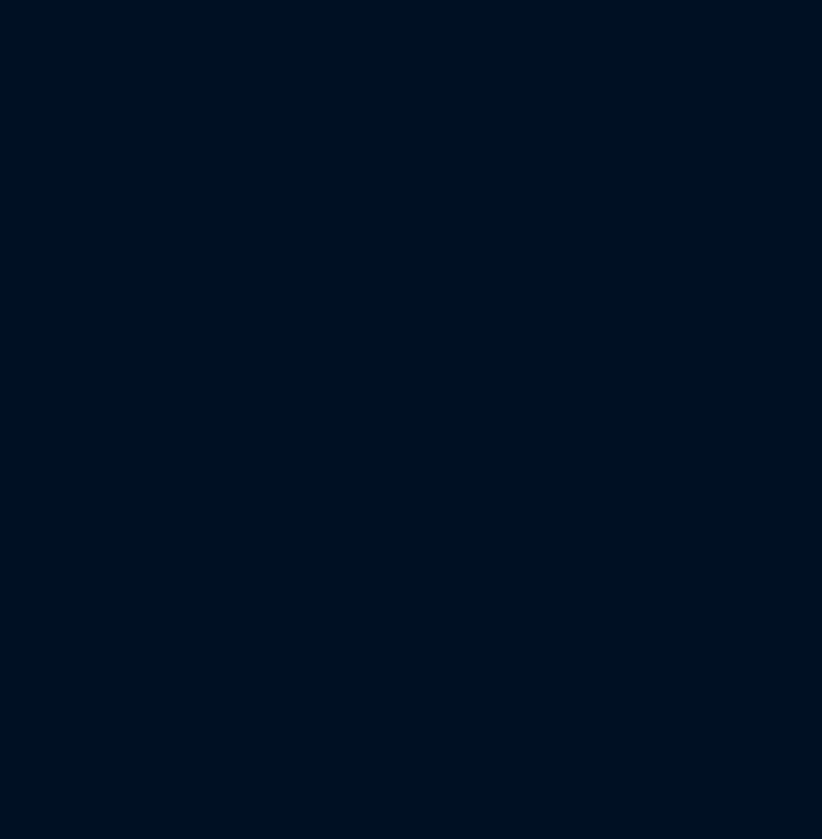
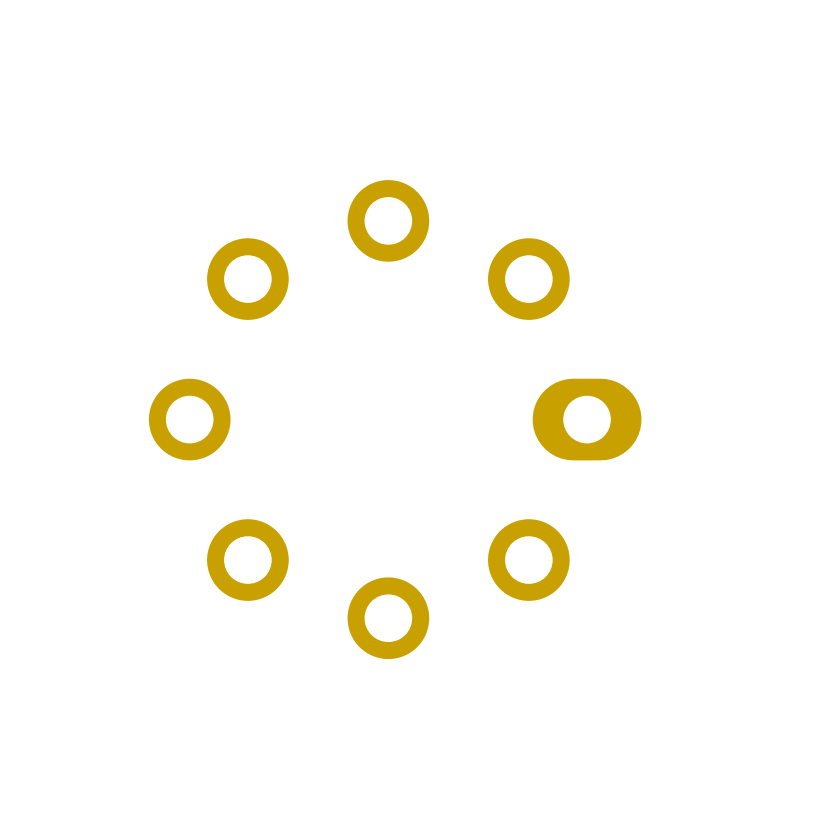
part: none -> (395, 419)

